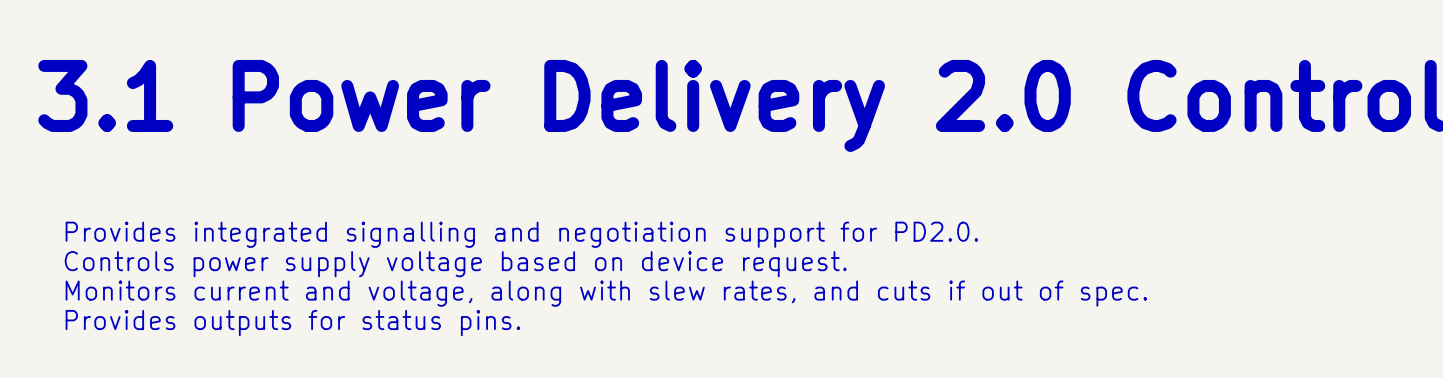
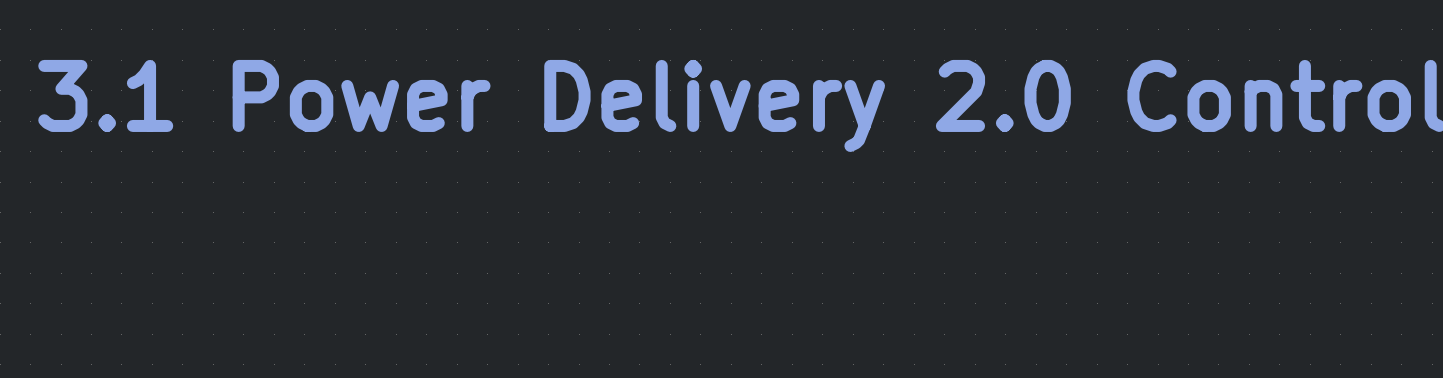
text: Provides integrated signalling and negotiation support for PD2.0. (521, 234) -> none
text: Controls power supply voltage based on device request. (455, 264) -> none
text: Monitors current and voltage, along with slew rates, and cuts if out of spec. (606, 293) -> none
text: Provides outputs for status pins. (292, 323) -> none

